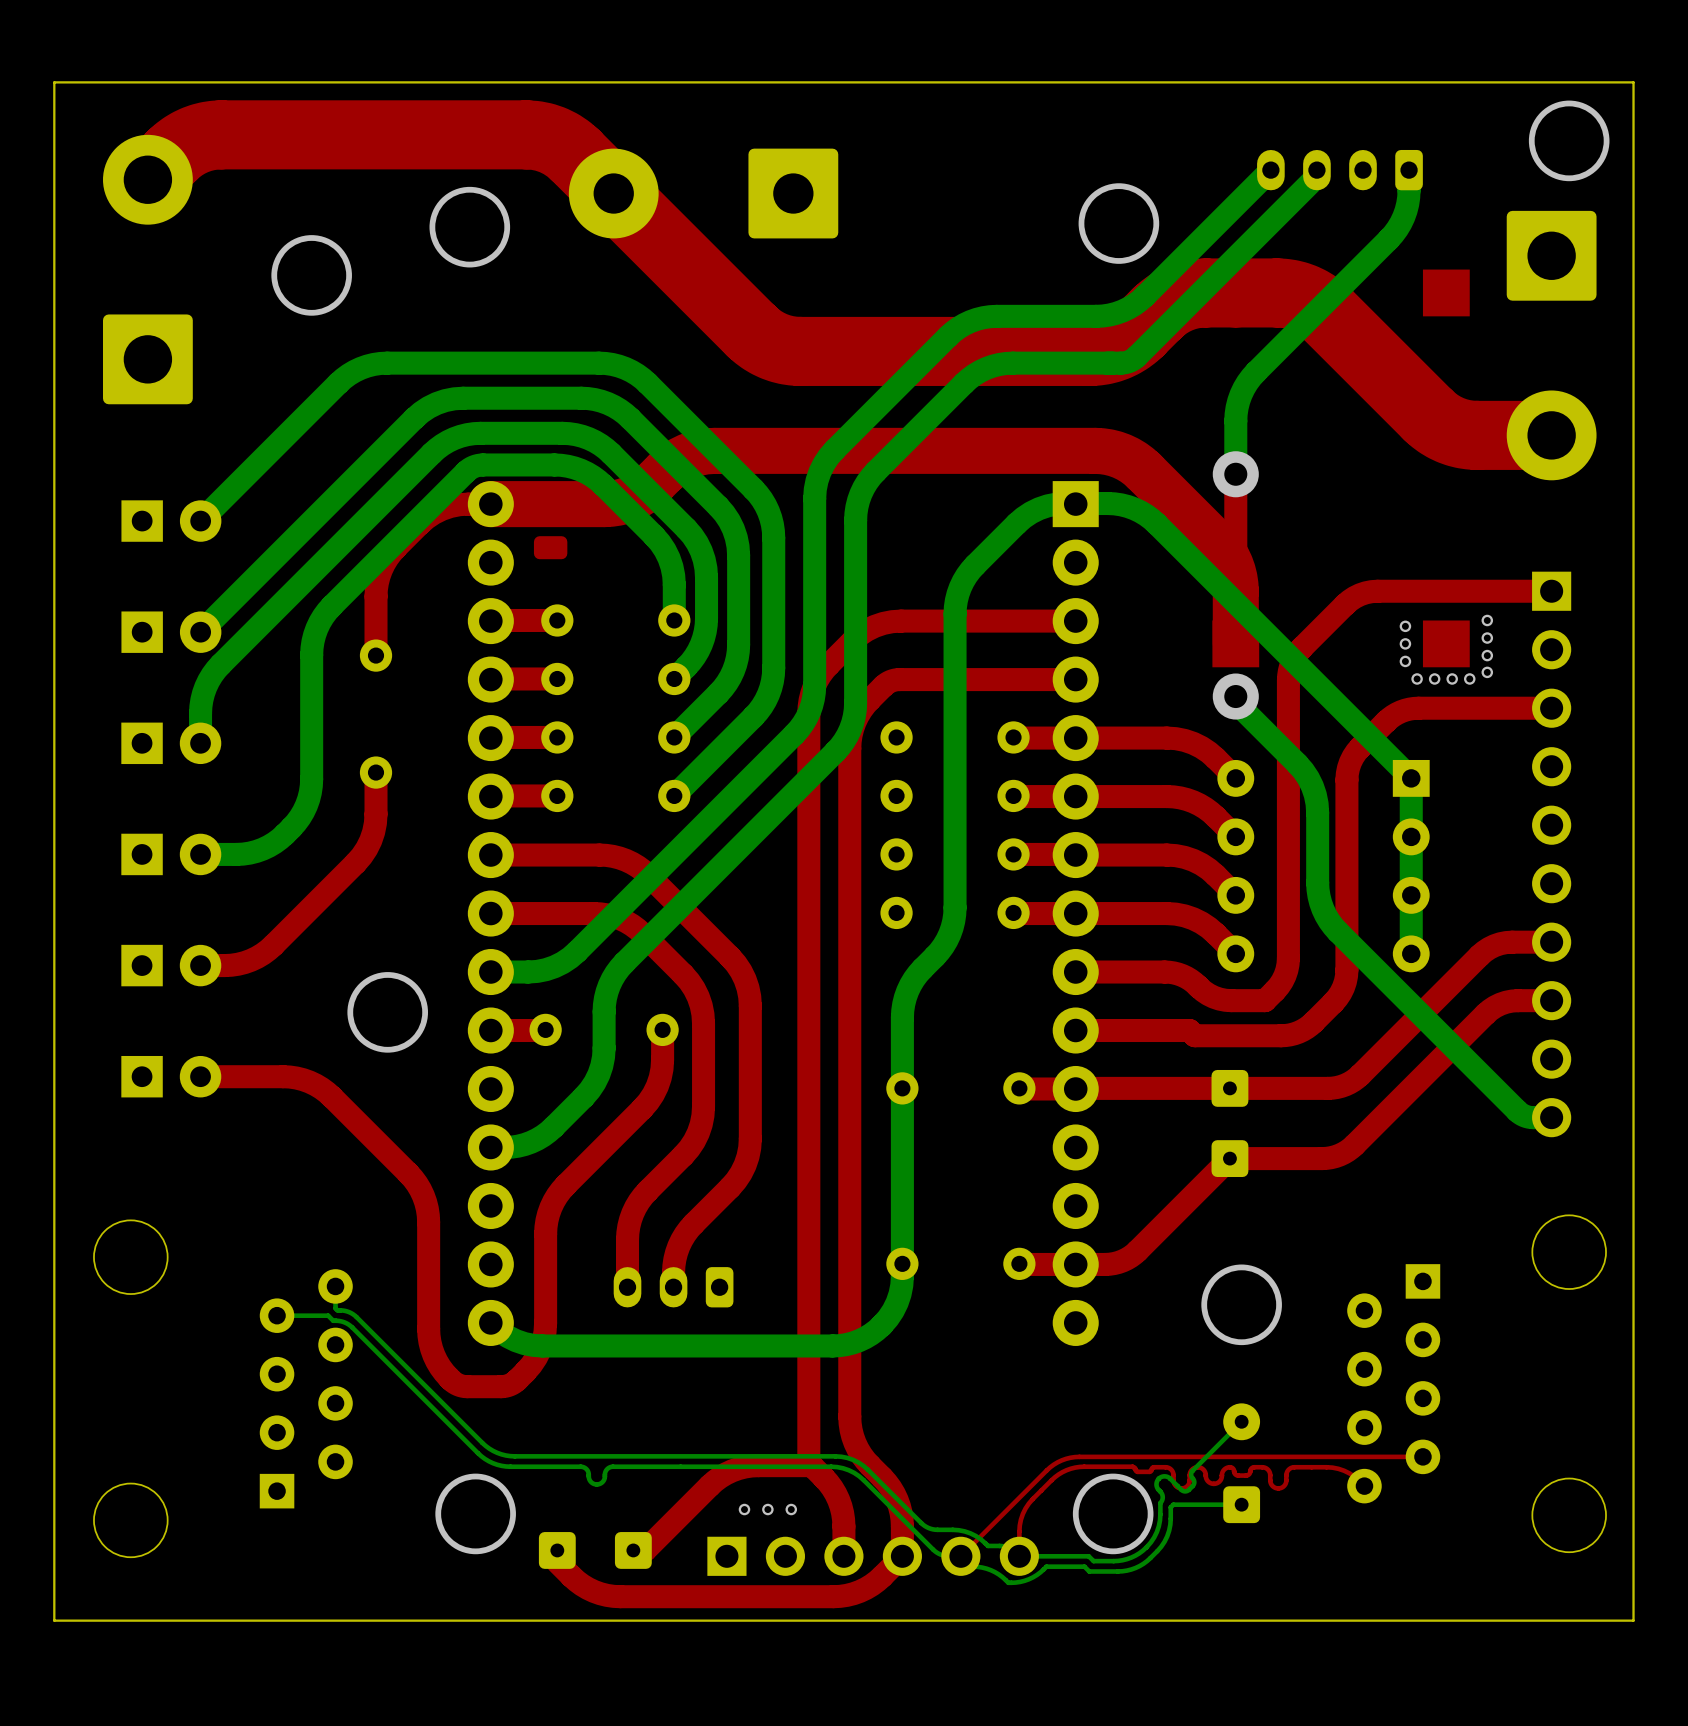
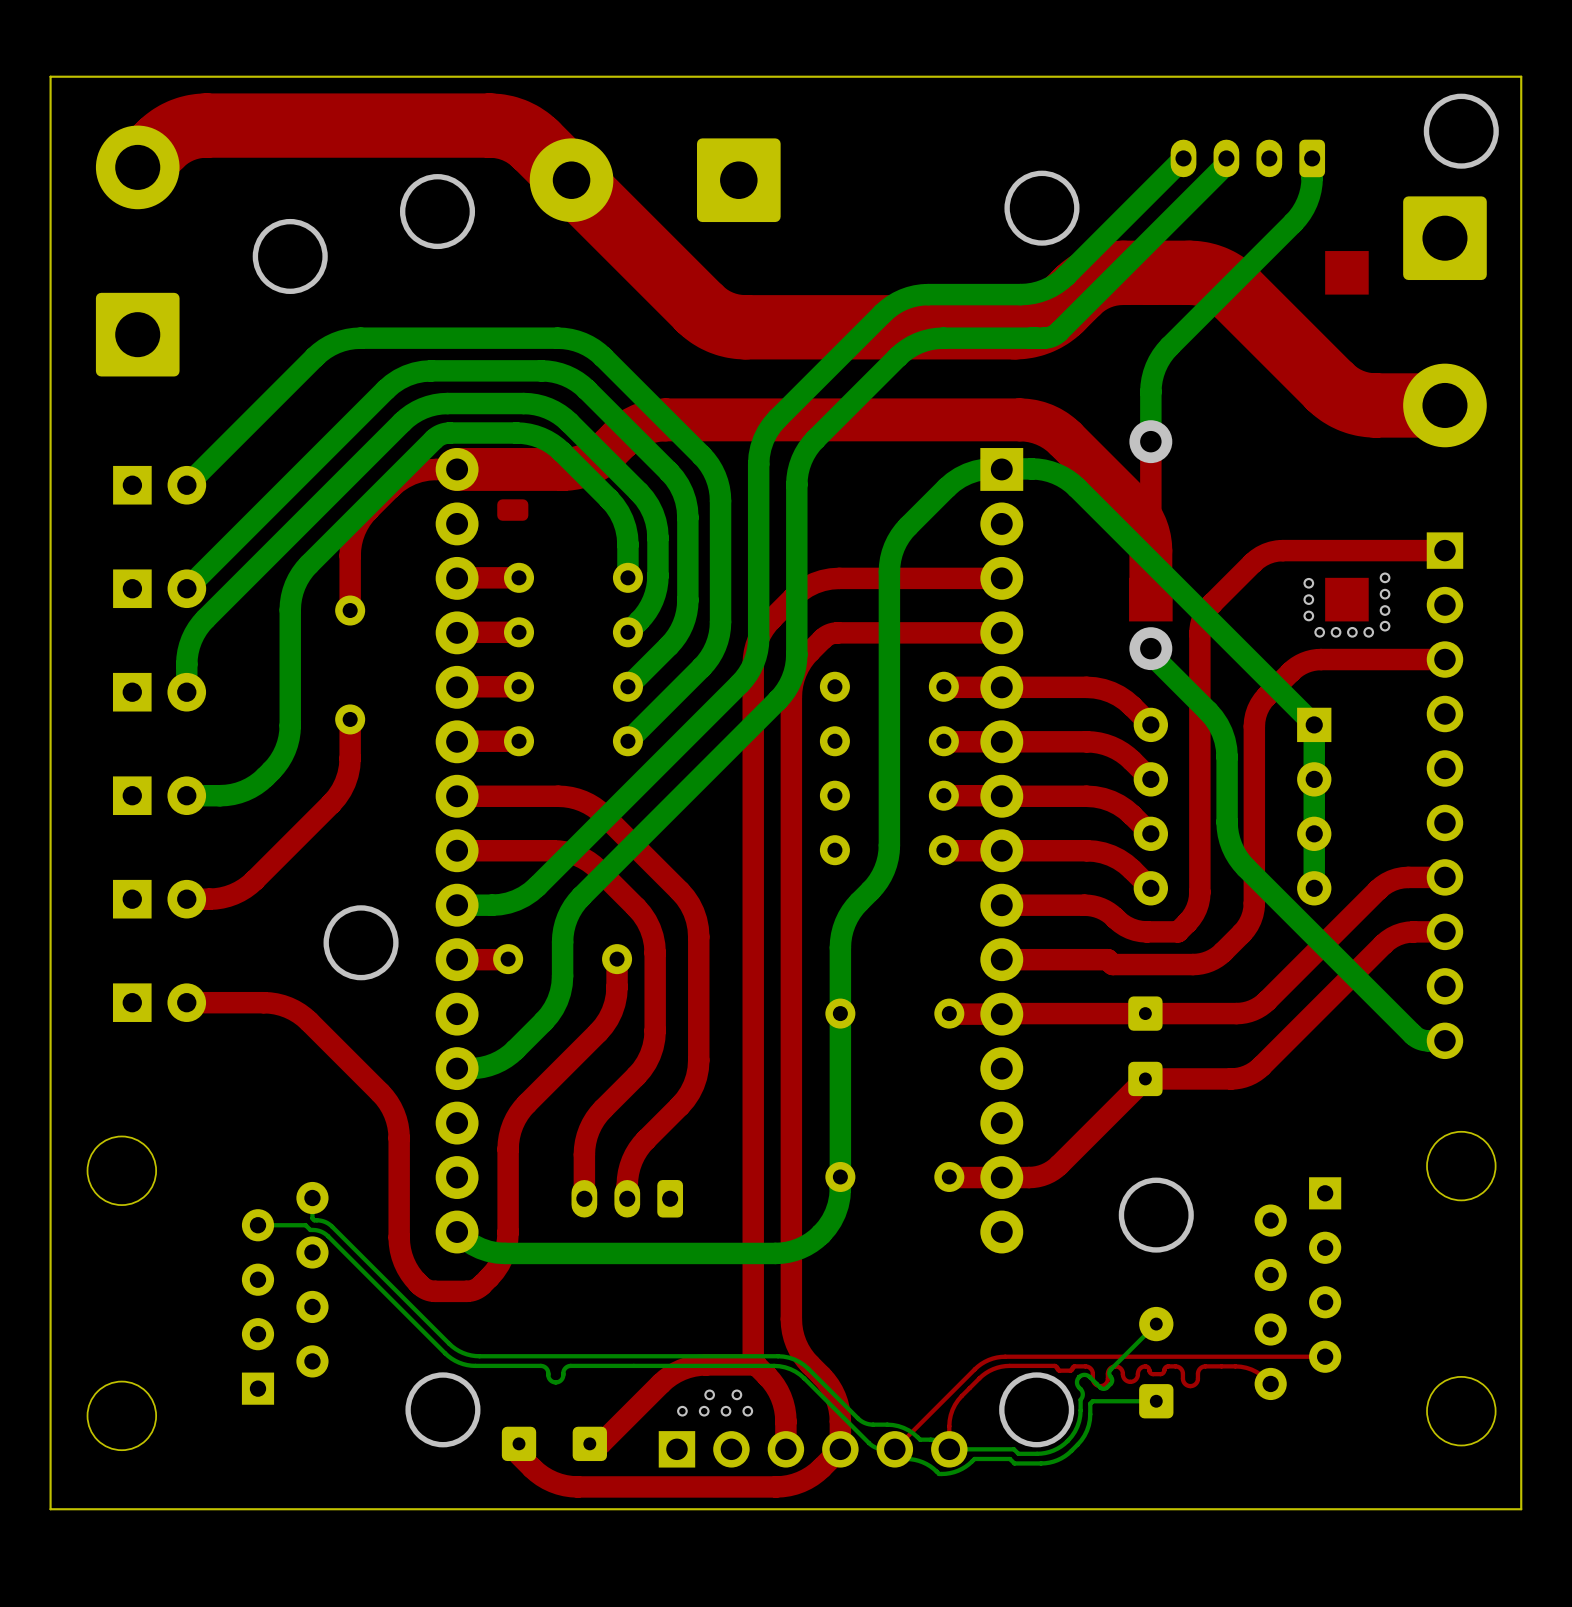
via: none -> (709, 1394)
via: none -> (736, 1394)
via: (744, 1509) -> none
via: (767, 1509) -> none
via: (791, 1509) -> none
via: none -> (682, 1411)
via: none -> (704, 1411)
via: none -> (725, 1411)
via: none -> (747, 1411)

